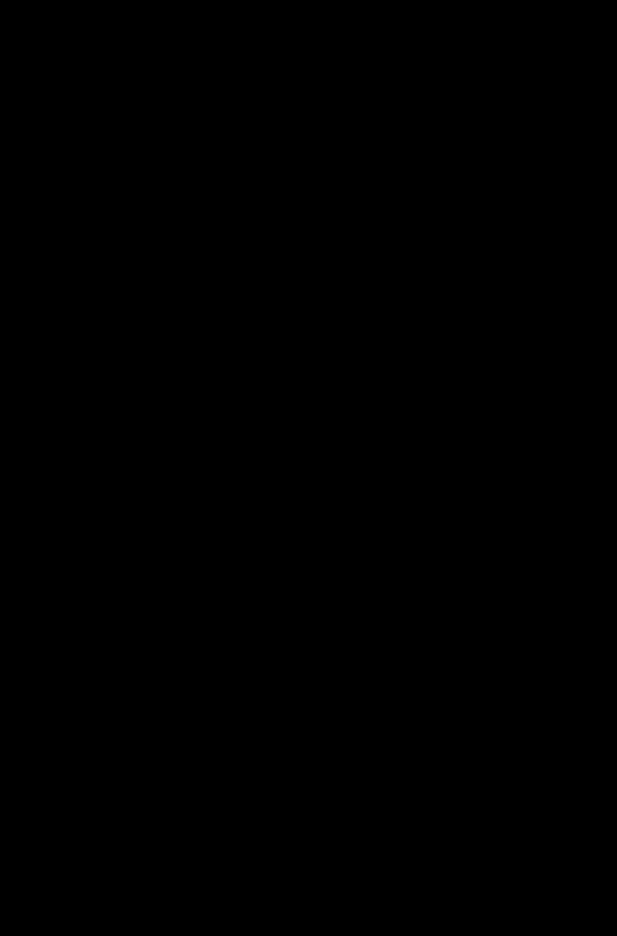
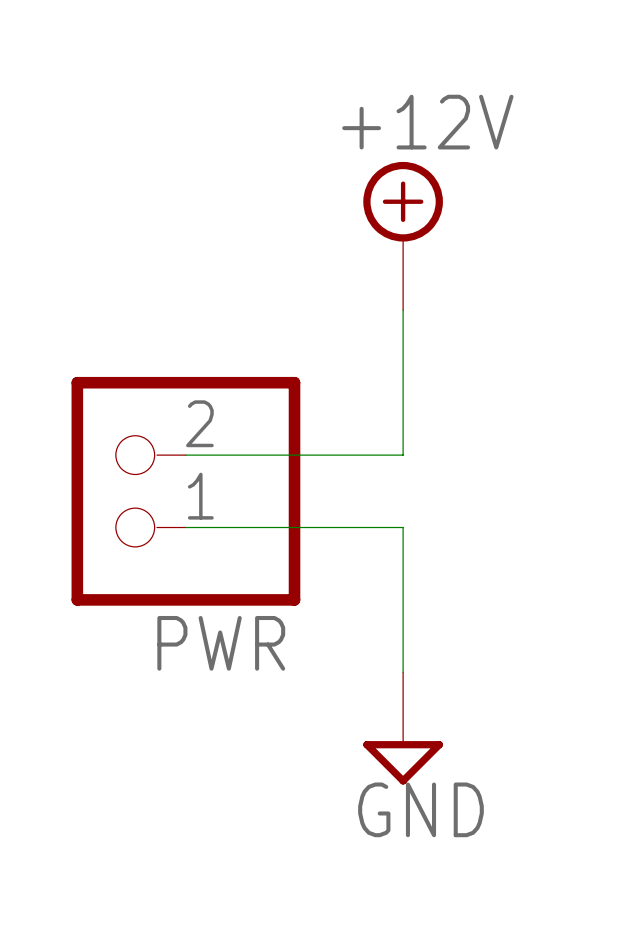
power symbol: none -> +12V (403, 236)
wire: none -> (403, 310) (403, 455) (185, 455)
PWR: none -> (185, 491)
wire: none -> (185, 527) (403, 527) (403, 672)
power symbol: none -> GND (403, 728)

